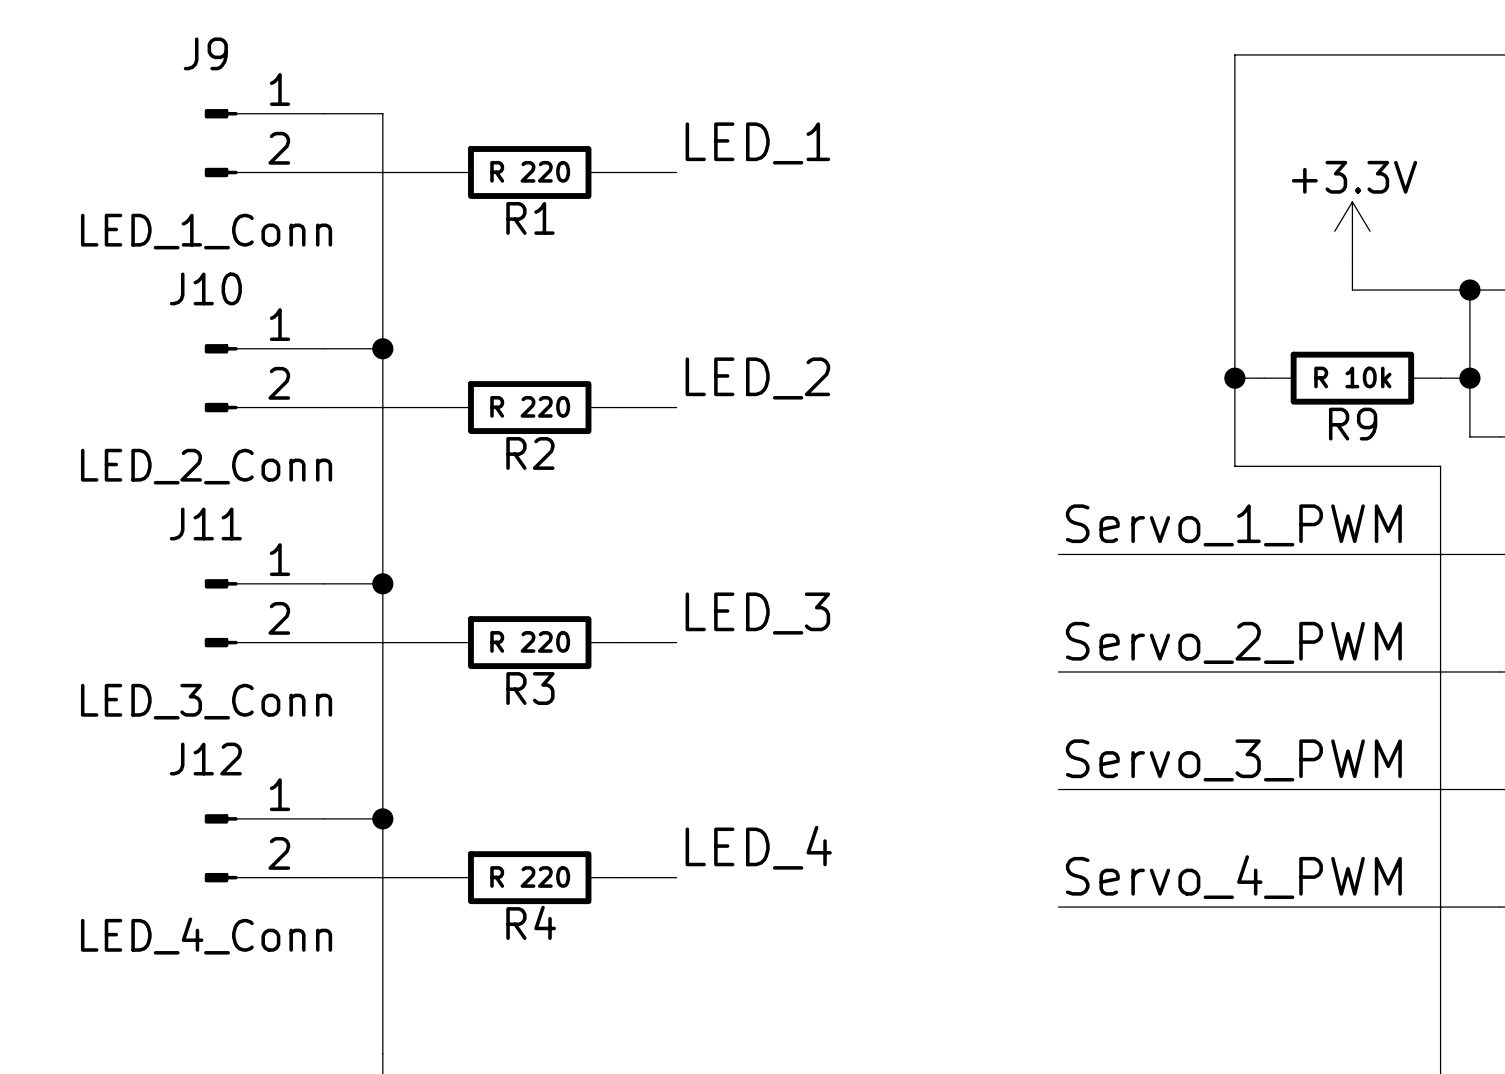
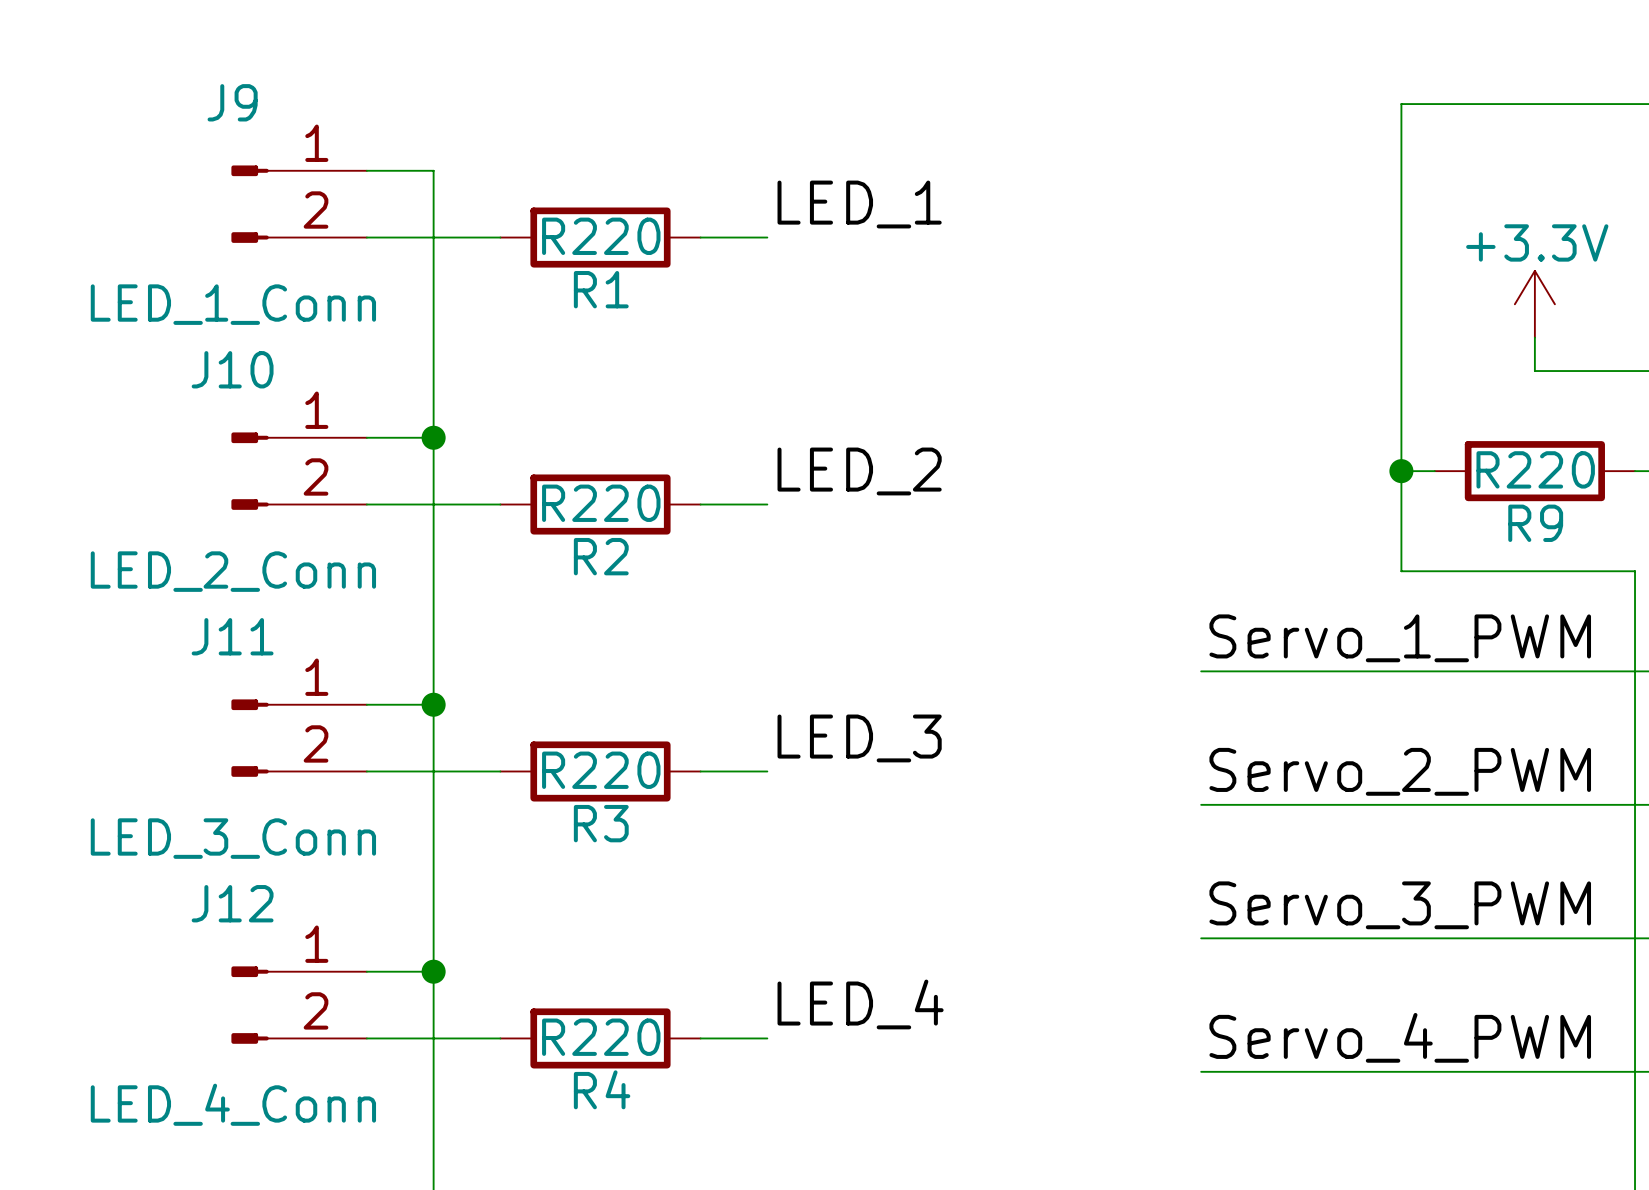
R1 value: R 220 (530, 171) -> R220 (601, 236)
R9 value: R 10k (1352, 377) -> R220 (1535, 469)
R2 value: R 220 (530, 406) -> R220 (601, 503)
R3 value: R 220 (530, 641) -> R220 (601, 770)
R4 value: R 220 (530, 876) -> R220 (601, 1037)

